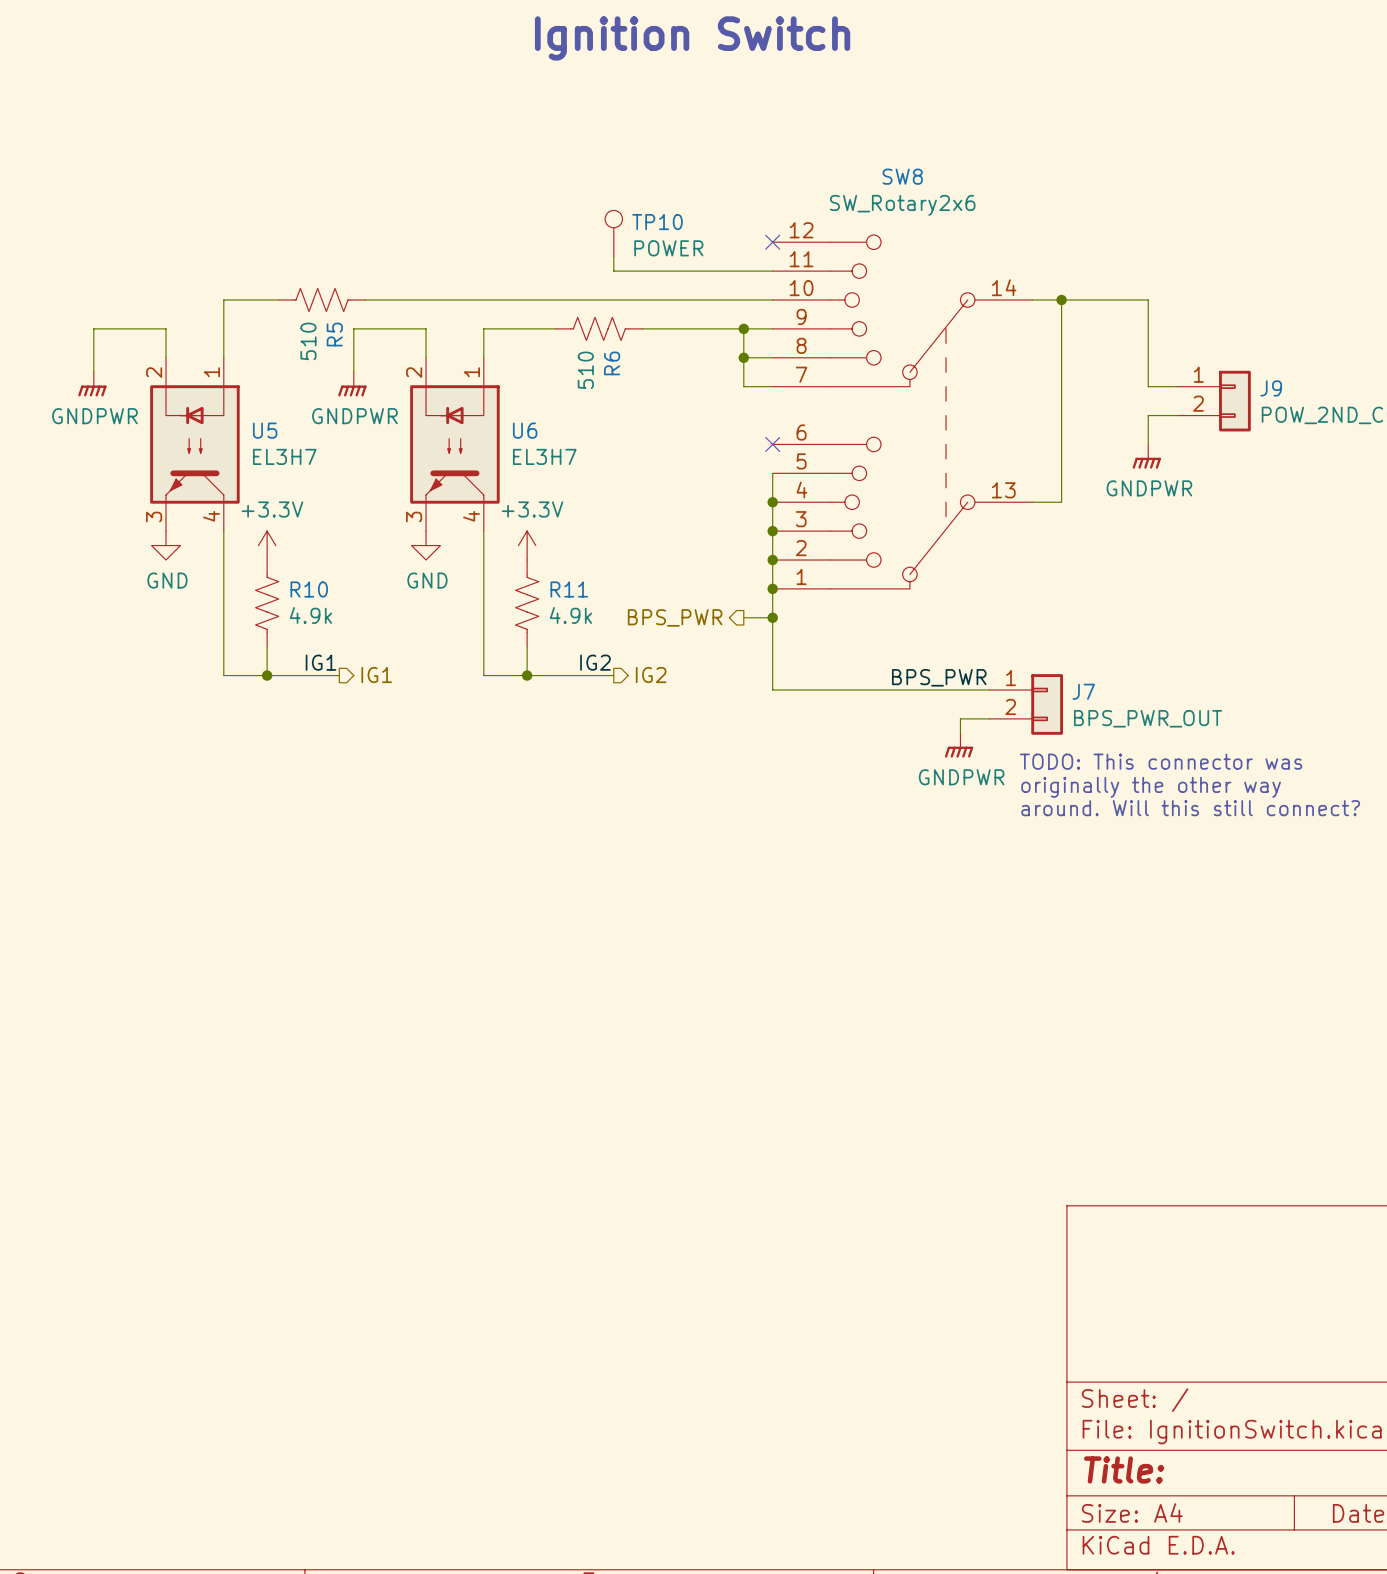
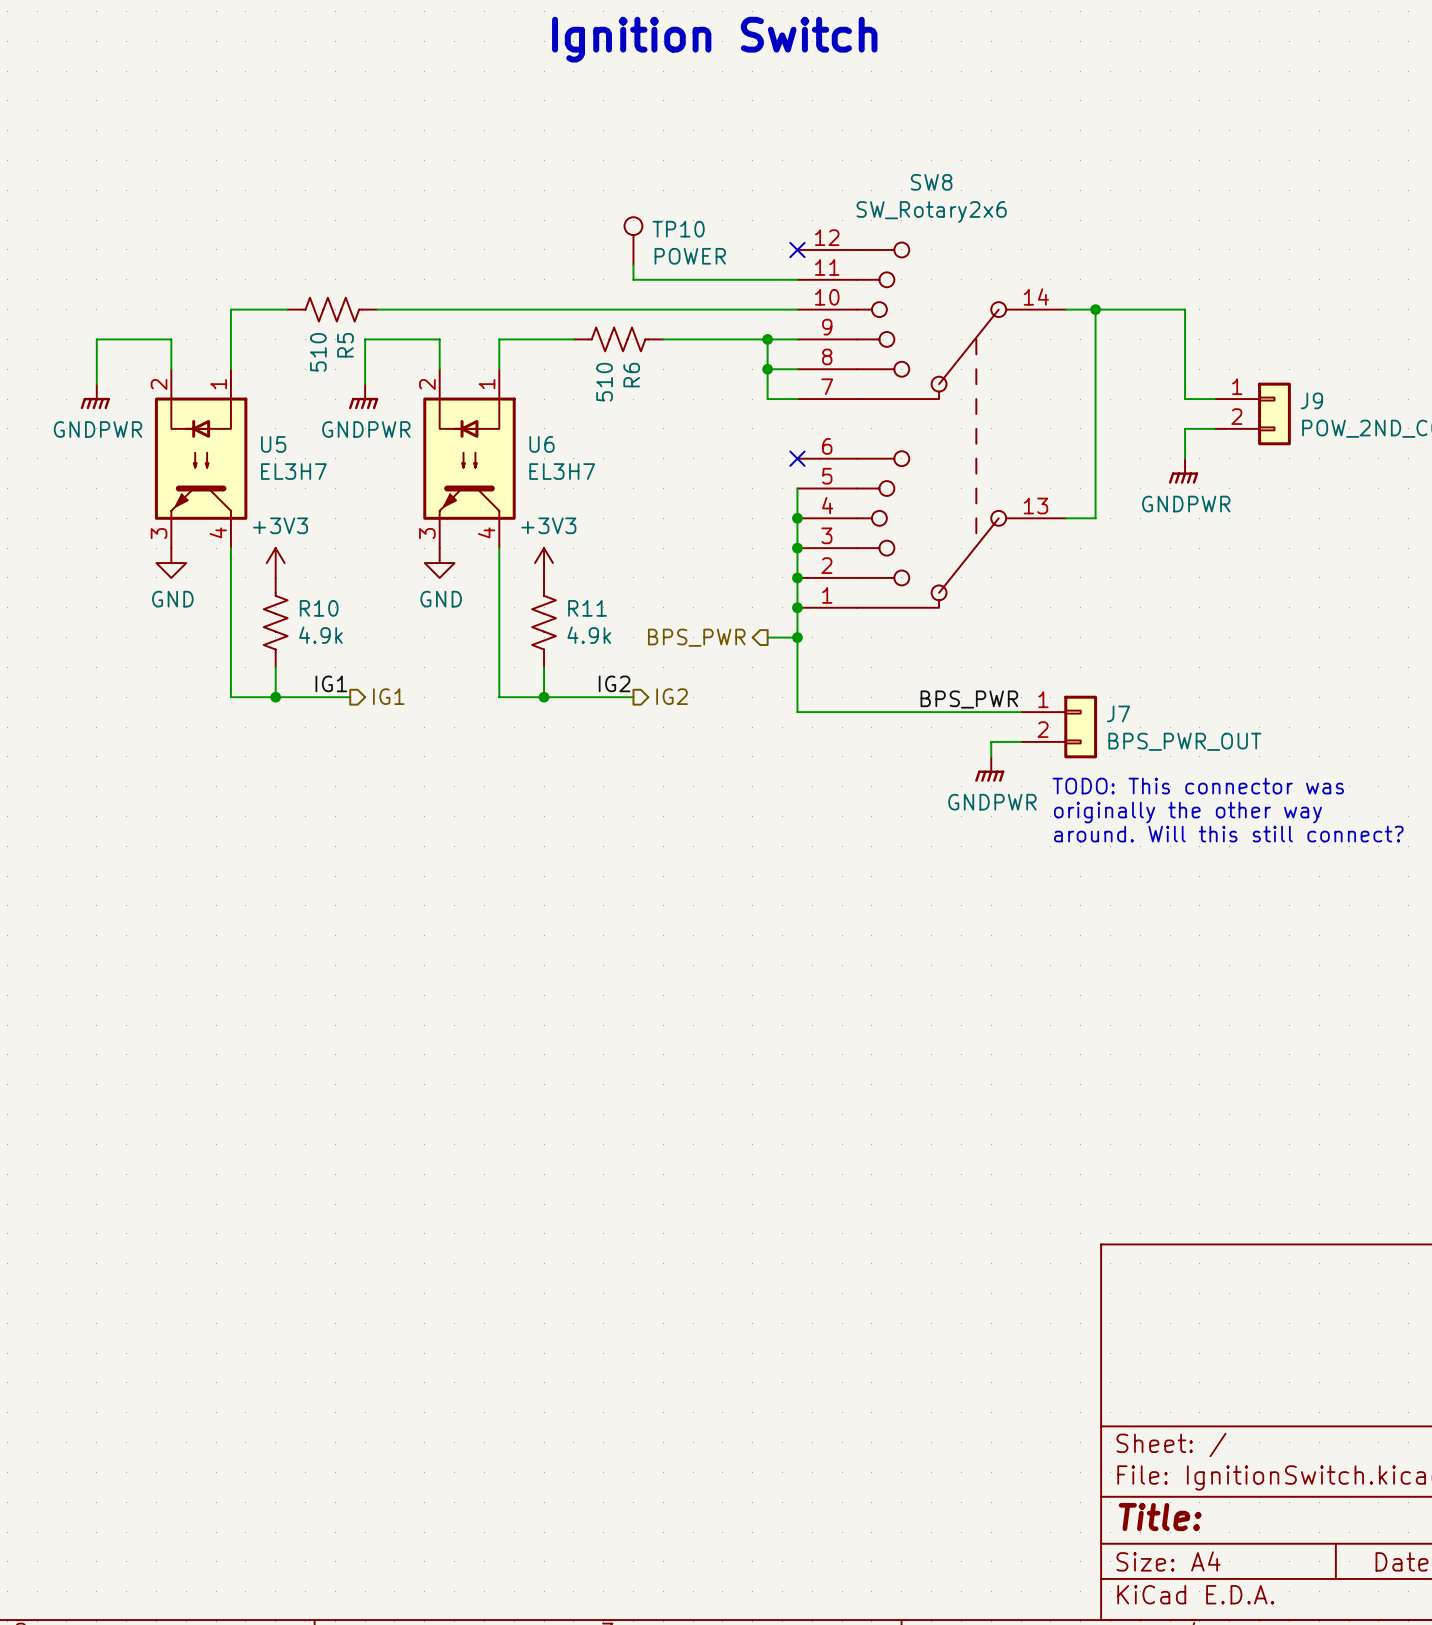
power symbol: +3.3V (267, 545) -> +3V3 (275, 563)
power symbol: +3.3V (527, 545) -> +3V3 (544, 563)

